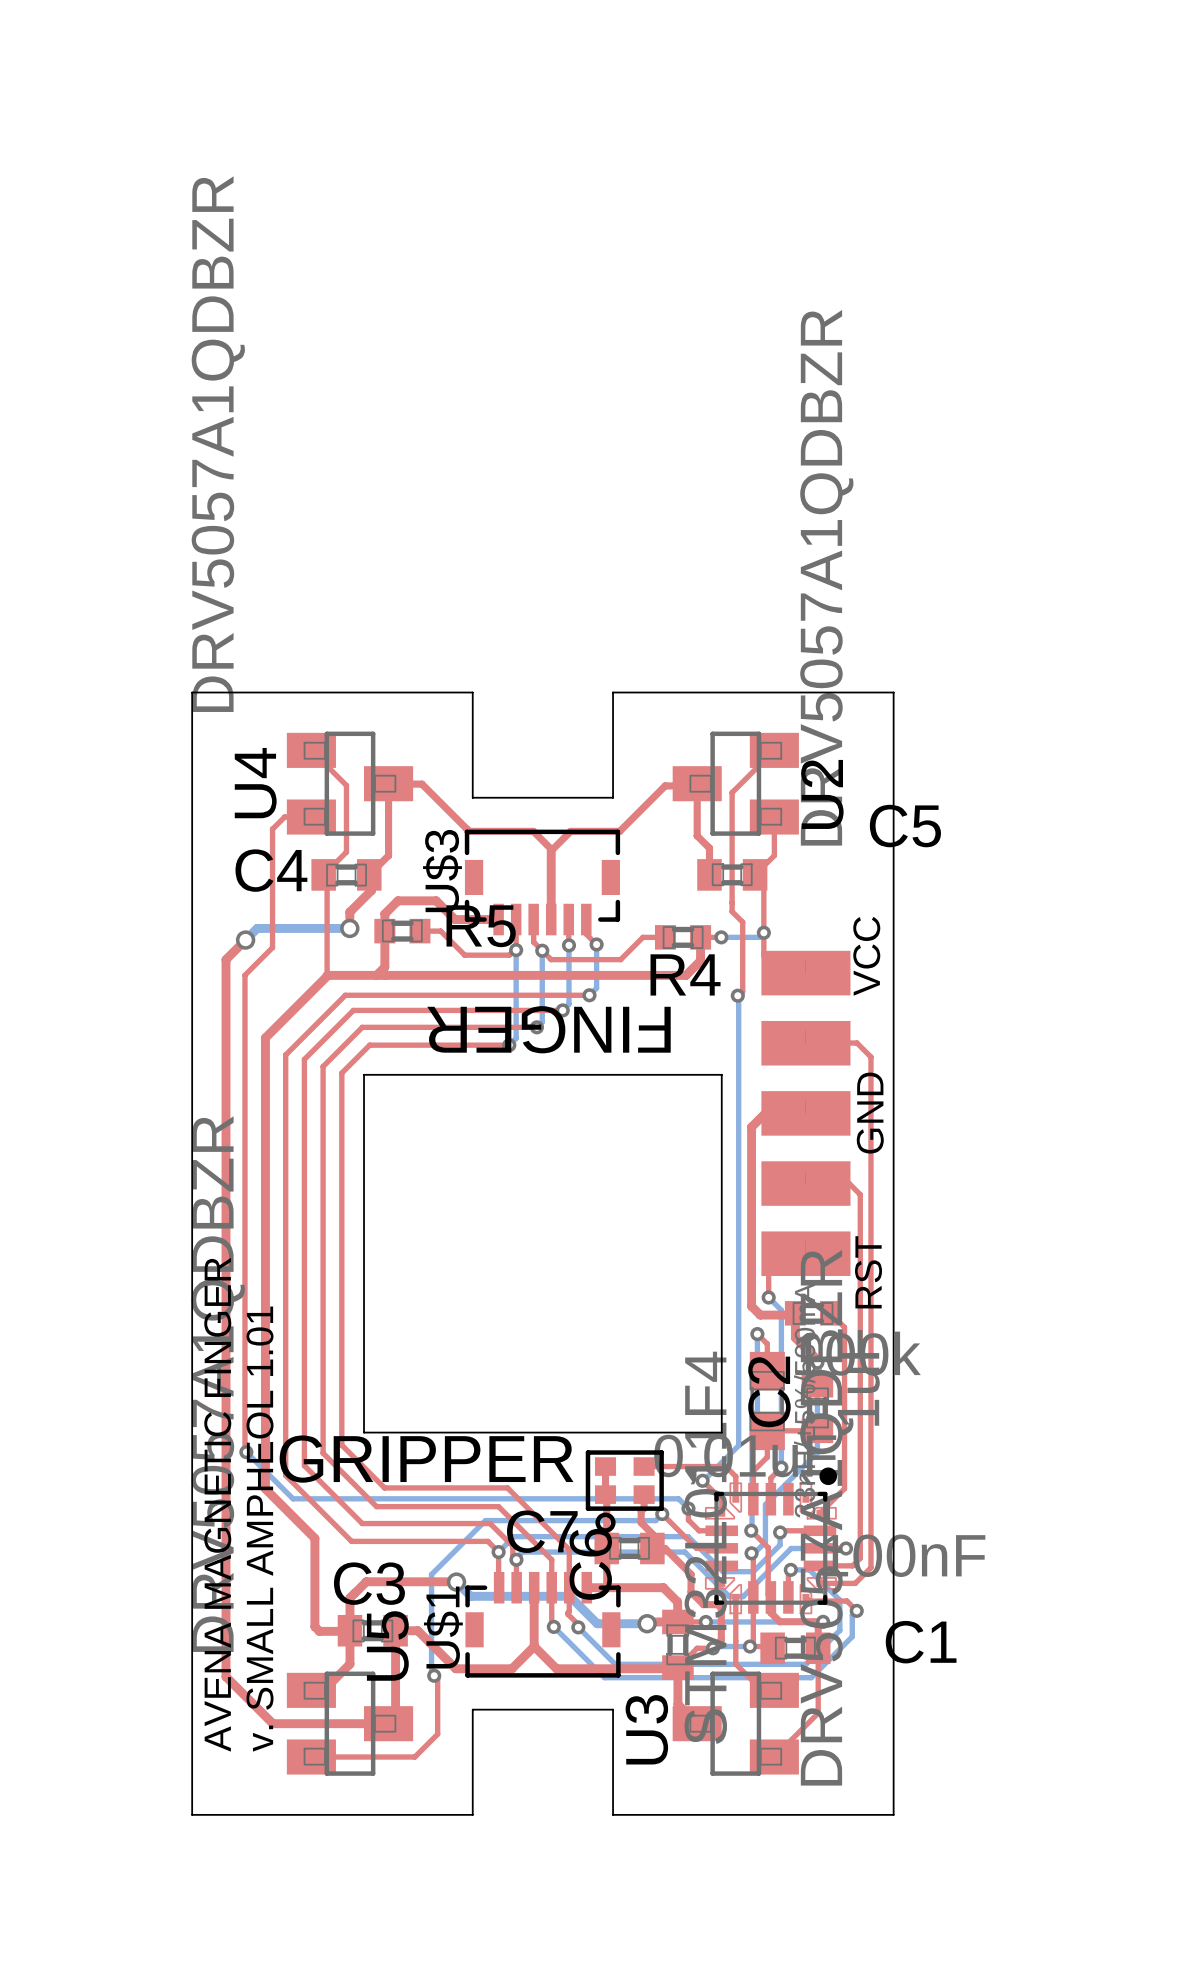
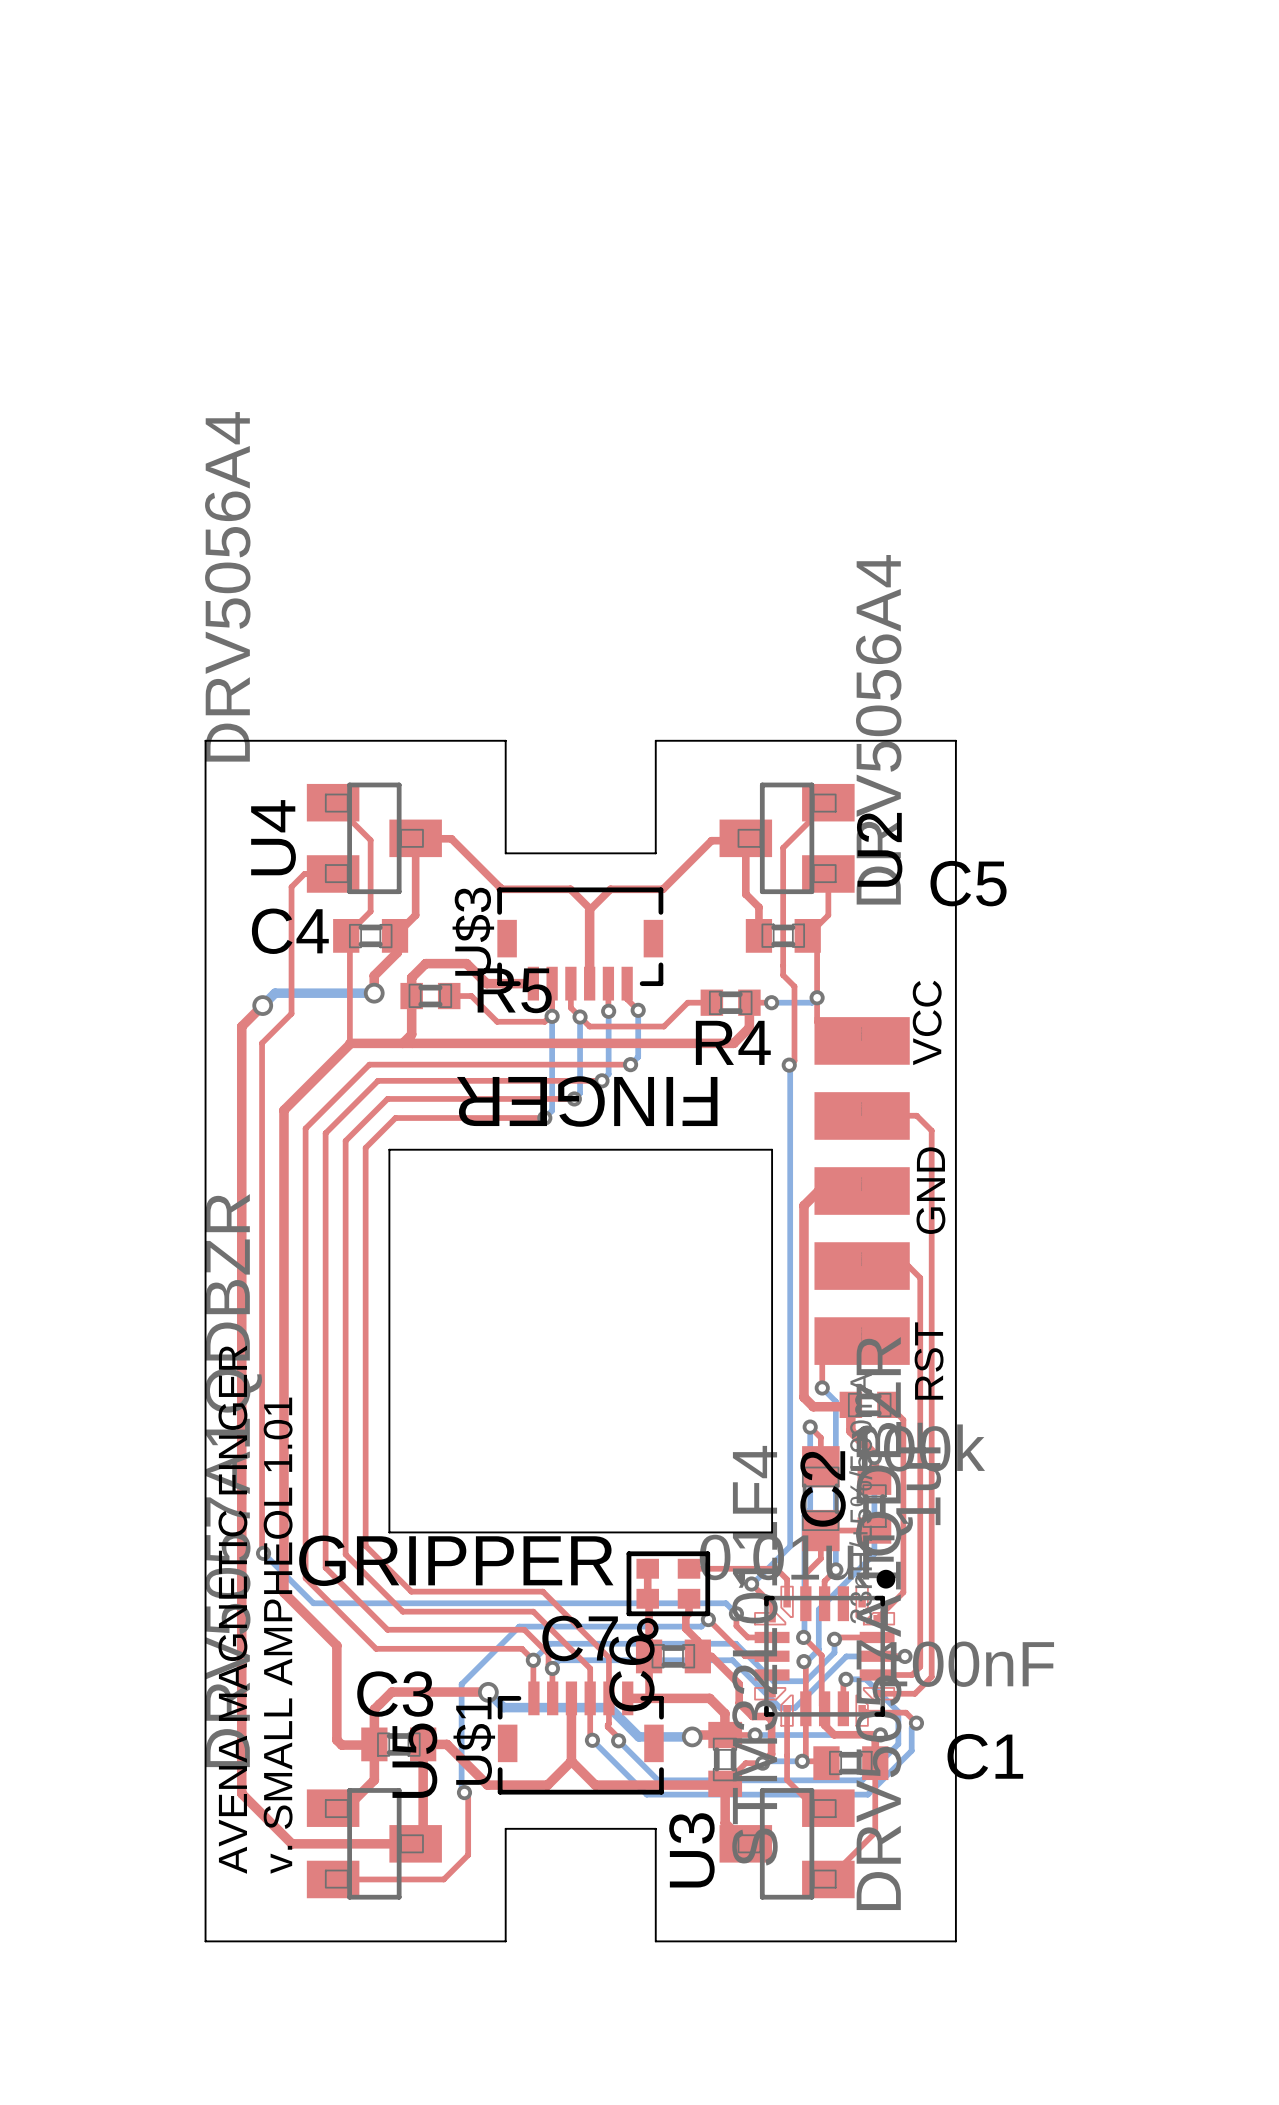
U4 value: DRV5057A1QDBZR (218, 444) -> DRV5056A4 (227, 586)
U2 value: DRV5057A1QDBZR (826, 577) -> DRV5056A4 (878, 729)

